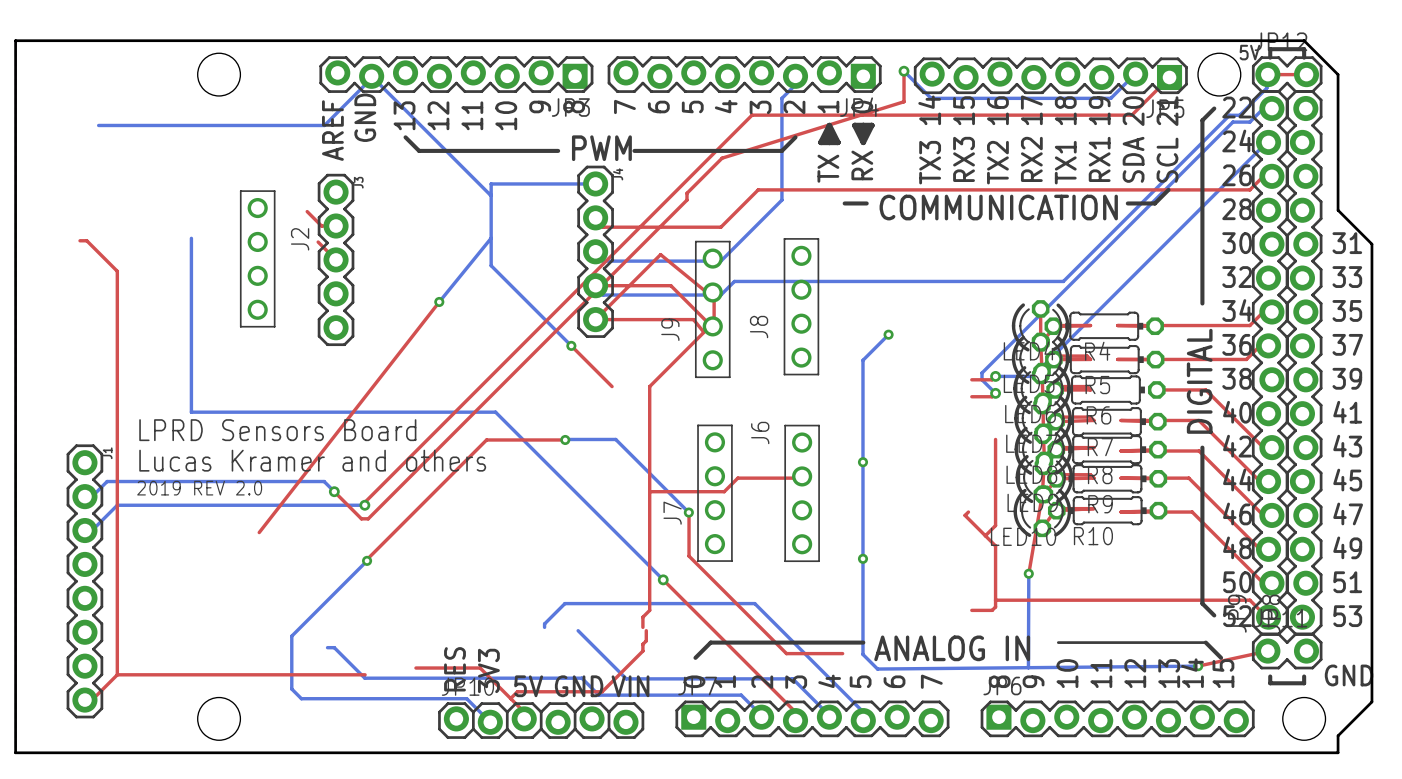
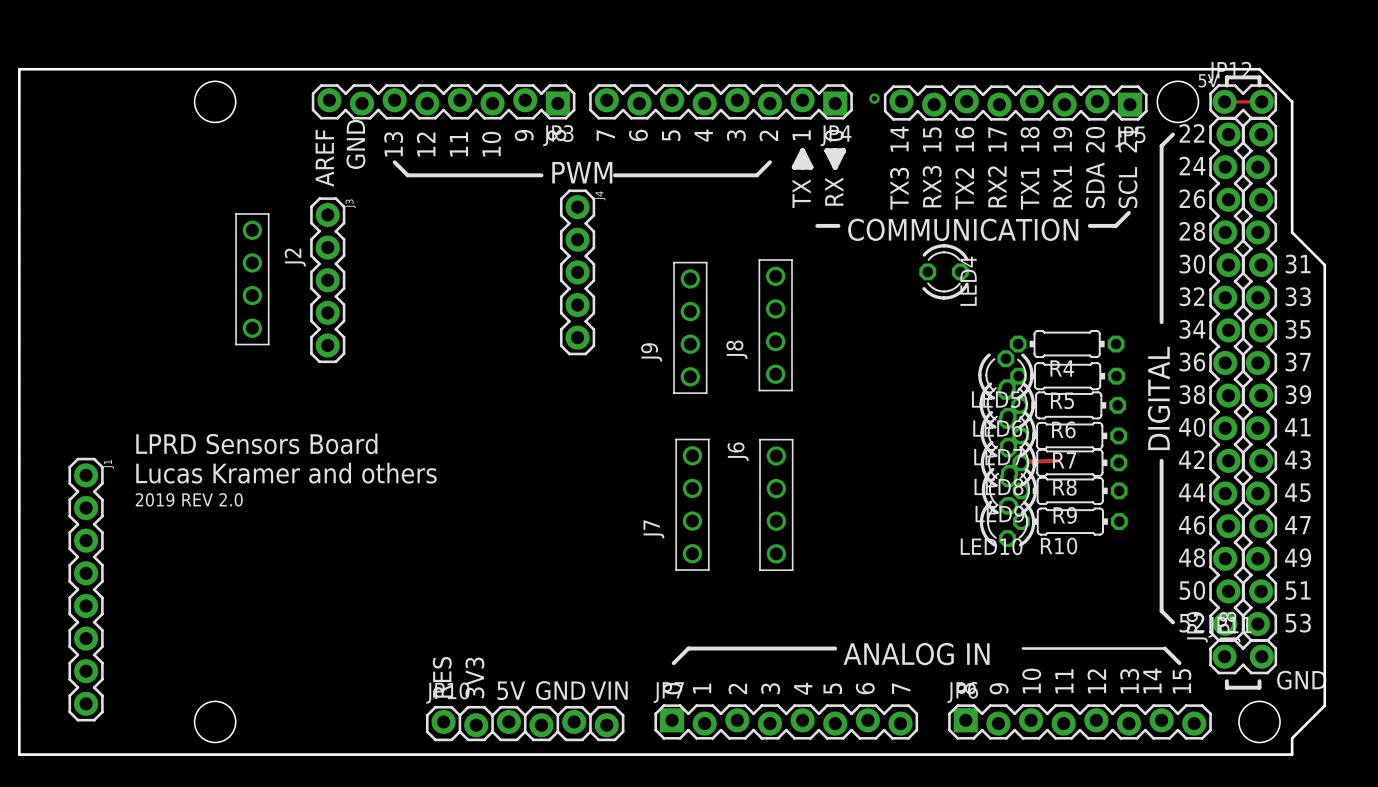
top track: (904, 71) (904, 101) (722, 158) (686, 193) (686, 200) (368, 518) (361, 518) (334, 491) -> none
bottom track: (904, 71) (931, 98) (1110, 98) (1135, 74) -> none
bottom track: (1267, 74) (1266, 88) (1239, 115) (1229, 115) (1063, 281) (734, 281) (720, 295) (603, 295) (595, 285) -> none
bottom track: (371, 76) (491, 195) -> none
bottom track: (795, 76) (795, 84) (781, 98) (781, 200) (720, 261) (603, 261) (595, 251) -> none
top track: (1169, 77) (1131, 115) (752, 115) (364, 502) (364, 505) -> none
bottom track: (371, 78) (324, 125) (98, 125) -> none
bottom track: (1271, 108) (1263, 108) (1249, 122) (1232, 122) (982, 373) (982, 379) (995, 393) -> none
bottom track: (1268, 142) (1032, 376) (995, 376) -> none
top track: (1271, 176) (1263, 176) (1249, 189) (758, 189) (720, 227) (603, 227) (595, 217) -> none
bottom track: (595, 183) (491, 183) (491, 265) (571, 345) -> none
top track: (307, 211) (321, 226) (336, 226) -> none
bottom track: (191, 238) (191, 412) (495, 412) (663, 579) -> none
bottom track: (491, 238) (439, 301) -> none
top track: (80, 240) (86, 240) (117, 271) (117, 674) -> none
top track: (318, 242) (336, 259) -> none
top track: (595, 285) (670, 285) (714, 328) (714, 298) (660, 254) (595, 319) (693, 319) (703, 332) (649, 386) (649, 610) (642, 617) (642, 627) -> none
top track: (439, 301) (259, 532) -> none
via: (439, 301) -> none
top track: (1040, 308) (1044, 460) (1042, 494) (1028, 573) -> none
top track: (1271, 311) (1263, 311) (1249, 325) (1117, 325) (1155, 326) -> none
LED4 rotation: 0° (1040, 325) -> 90° counterclockwise (944, 271)
LED4 position: (1040, 325) -> (944, 271)
top track: (1053, 326) (1090, 325) (1056, 325) (1040, 342) -> none
bottom track: (888, 334) (862, 360) (862, 654) (877, 669) (1198, 666) -> none
via: (888, 334) -> none
top track: (571, 345) (612, 386) -> none
via: (571, 345) -> none
top track: (1268, 345) (1260, 345) (1246, 359) (1117, 359) (1155, 359) -> none
top track: (1053, 359) (1090, 359) (1087, 356) (1056, 356) (1040, 375) -> none
top track: (995, 376) (992, 379) (971, 379) -> none
via: (995, 376) -> none
top track: (1055, 389) (1090, 389) (1087, 386) (1056, 386) (1042, 405) -> none
top track: (1156, 389) (1205, 389) (1263, 447) (1271, 447) -> none
top track: (995, 393) (992, 396) (971, 396) -> none
via: (995, 393) -> none
top track: (1056, 421) (1093, 420) (1090, 417) (1059, 417) (1043, 435) -> none
top track: (1157, 421) (1121, 420) (1199, 420) (1260, 481) (1268, 481) -> none
top track: (565, 439) (486, 439) (367, 560) -> none
bottom track: (565, 439) (615, 439) (688, 512) -> none
via: (565, 439) -> none
top track: (995, 439) (995, 525) (985, 535) -> none
top track: (1157, 449) (1121, 451) (1199, 451) (1263, 515) (1271, 515) -> none
via: (862, 462) -> none
top track: (802, 476) (798, 478) (737, 478) (724, 491) (649, 491) -> none
top track: (1056, 478) (1093, 478) (1090, 474) (1059, 474) (1044, 494) -> none
top track: (1158, 478) (1121, 478) (1188, 478) (1260, 549) (1268, 549) -> none
bottom track: (334, 491) (324, 481) (107, 481) (93, 495) (84, 496) -> none
via: (334, 491) -> none
bottom track: (364, 505) (117, 505) (93, 528) (84, 530) -> none
via: (364, 505) -> none
top track: (1056, 510) (1093, 508) (1056, 508) (1042, 528) -> none
top track: (1158, 510) (1121, 512) (1192, 512) (1263, 583) (1271, 583) -> none
via: (688, 512) -> none
top track: (689, 512) (689, 556) (786, 653) (842, 653) -> none
top track: (968, 512) (965, 515) (995, 545) (995, 606) (992, 610) (971, 610) -> none
via: (862, 558) -> none
bottom track: (367, 560) (291, 636) (291, 689) (301, 698) (466, 698) (490, 722) -> none
via: (367, 560) -> none
bottom track: (1028, 573) (1028, 667) -> none
via: (1028, 573) -> none
top track: (663, 579) (795, 712) (795, 720) -> none
via: (663, 579) -> none
top track: (995, 600) (1249, 600) (1268, 617) -> none
bottom track: (544, 627) (544, 623) (564, 603) (754, 603) (863, 712) (863, 720) -> none
bottom track: (578, 630) (626, 678) (792, 678) (829, 717) -> none
top track: (646, 630) (646, 640) (642, 644) (642, 651) (602, 691) (517, 691) (510, 698) -> none
bottom track: (327, 647) (334, 647) (364, 678) (581, 678) (598, 695) (741, 695) (761, 717) -> none
top track: (1267, 651) (1198, 666) -> none
via: (1198, 666) -> none
top track: (415, 668) (480, 668) (524, 712) (524, 718) -> none
top track: (117, 674) (93, 698) (84, 700) -> none
top track: (117, 674) (365, 674) -> none

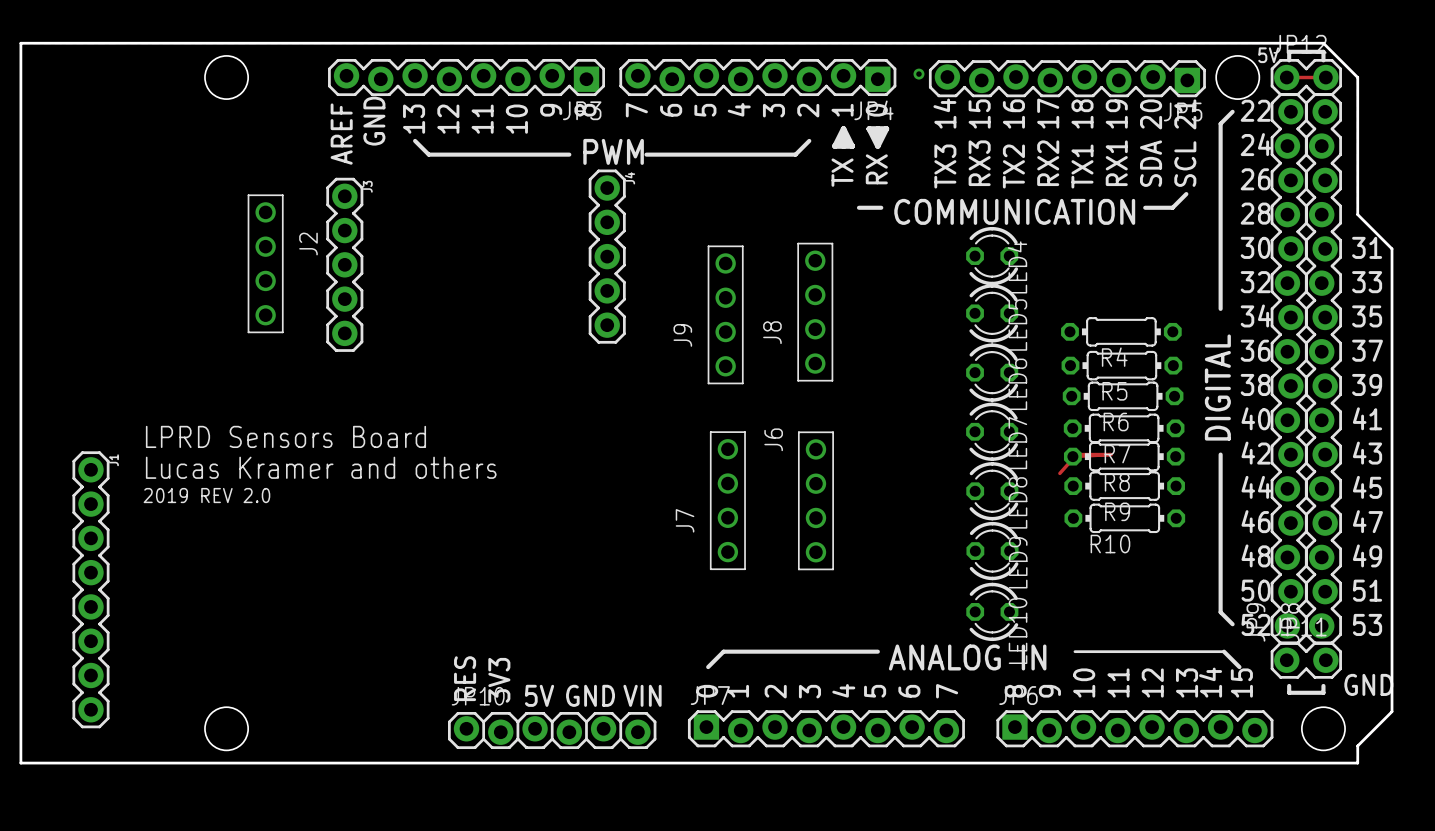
LED5 rotation: 0° (1005, 375) -> 90° counterclockwise (992, 313)
LED5 position: (1005, 375) -> (992, 313)
LED6 rotation: 0° (1007, 404) -> 90° counterclockwise (992, 372)
LED6 position: (1007, 404) -> (992, 372)
LED7 rotation: 0° (1008, 432) -> 90° counterclockwise (992, 431)
LED7 position: (1008, 432) -> (992, 431)
LED8 rotation: 0° (1008, 462) -> 90° counterclockwise (992, 491)
LED8 position: (1008, 462) -> (992, 491)
LED9 rotation: 0° (1009, 489) -> 90° counterclockwise (992, 551)
LED9 position: (1009, 489) -> (992, 551)
LED10 rotation: 0° (1007, 522) -> 90° counterclockwise (992, 611)
LED10 position: (1007, 522) -> (992, 611)

